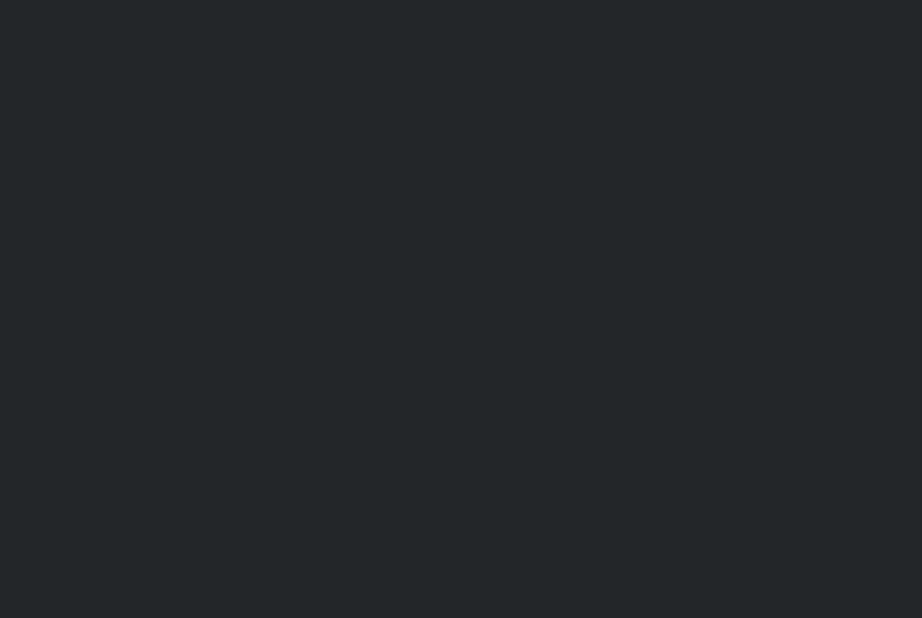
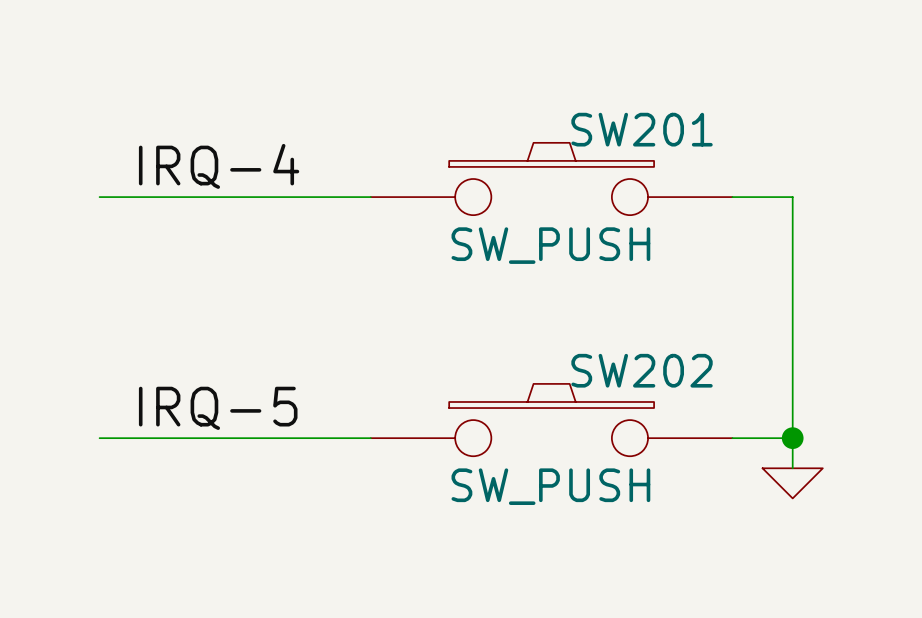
label: none -> IRQ-4 (219, 166)
SW201: none -> SW_PUSH (551, 178)
wire: none -> (99, 197) (370, 197)
wire: none -> (732, 197) (792, 197) (792, 468)
label: none -> IRQ-5 (218, 408)
SW202: none -> SW_PUSH (551, 420)
wire: none -> (99, 438) (370, 438)
wire: none -> (732, 438) (792, 438)
junction: none -> (792, 438)
power symbol: none -> (792, 483)

